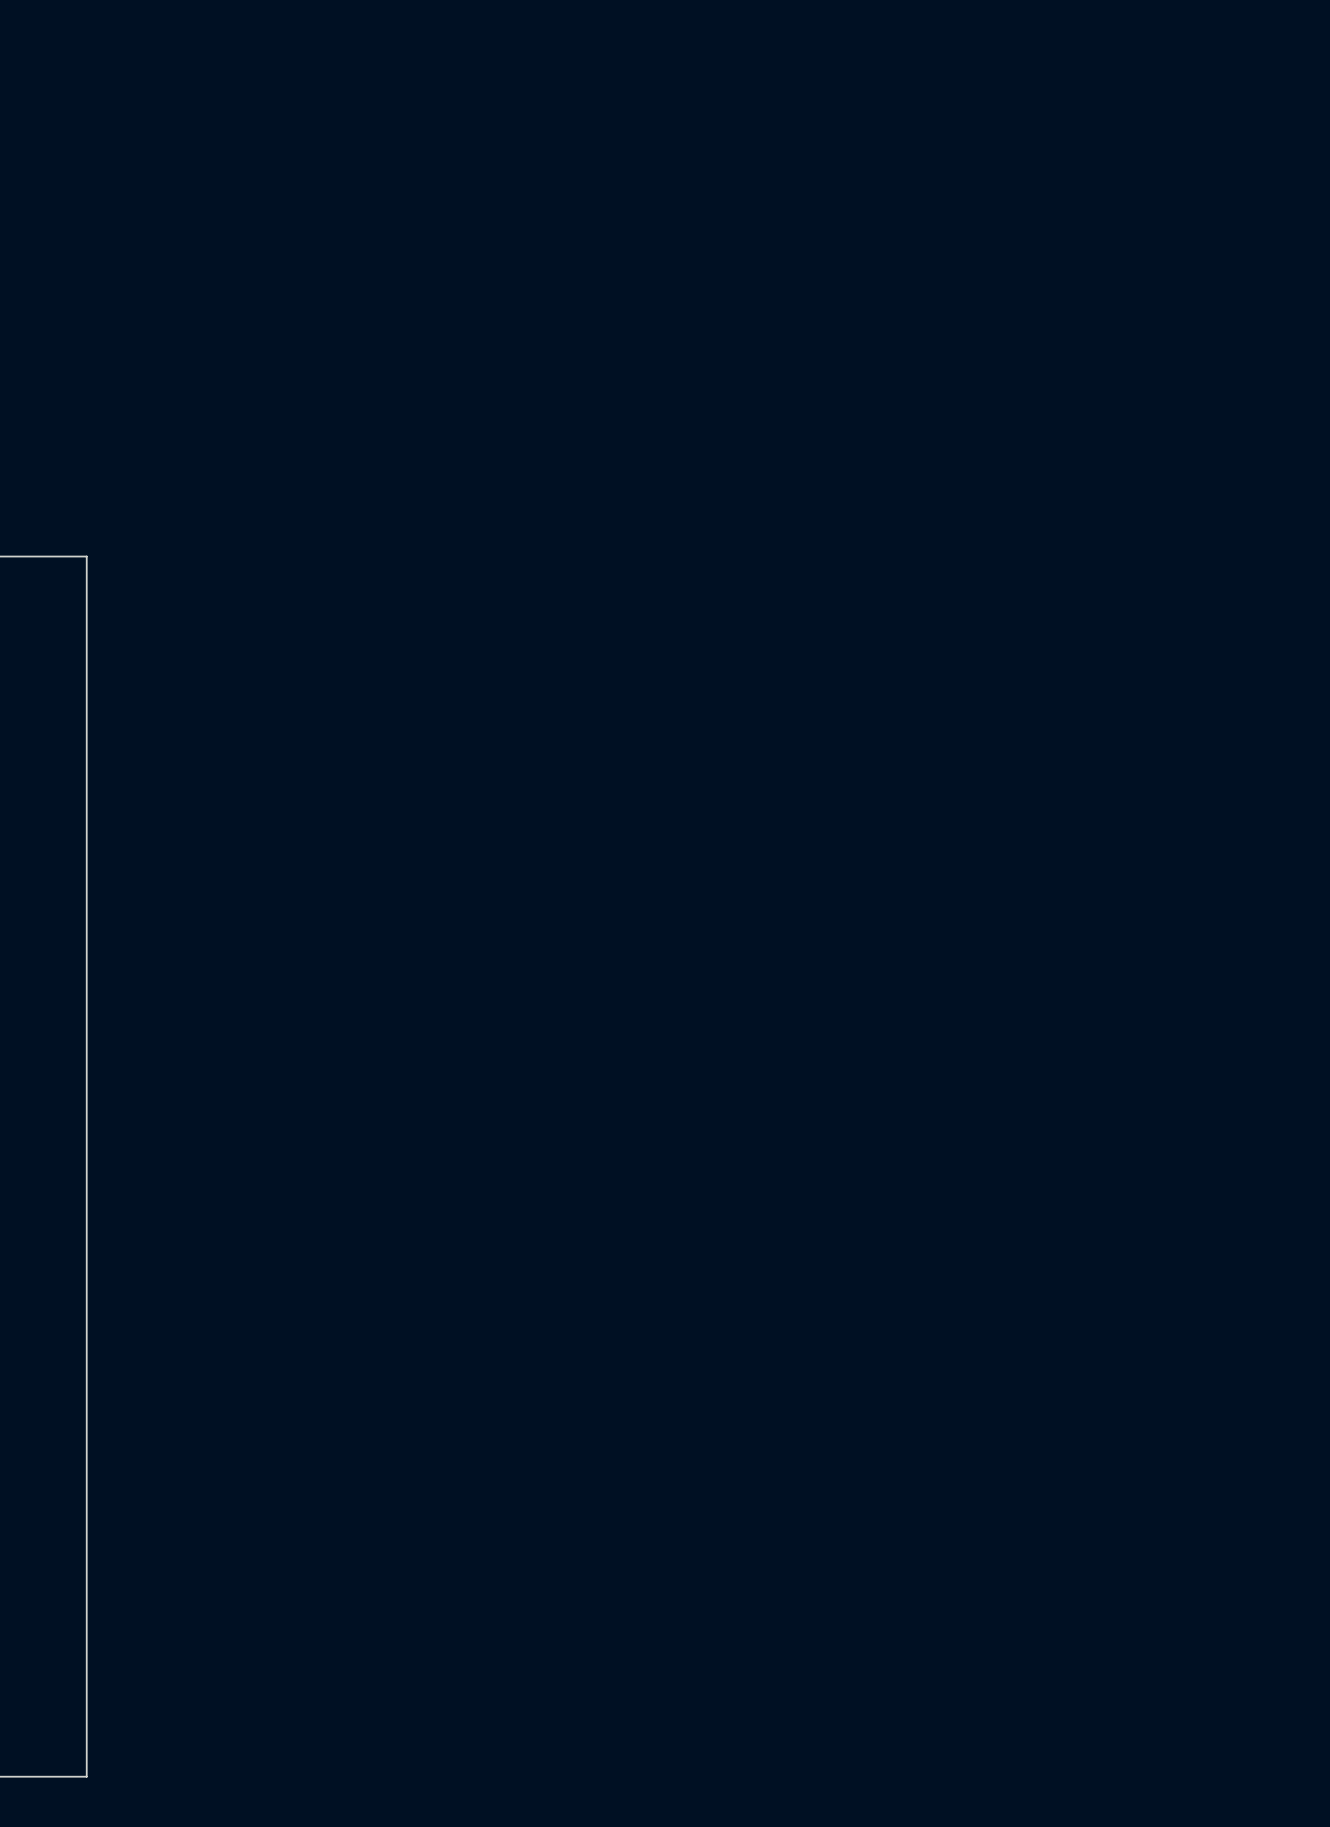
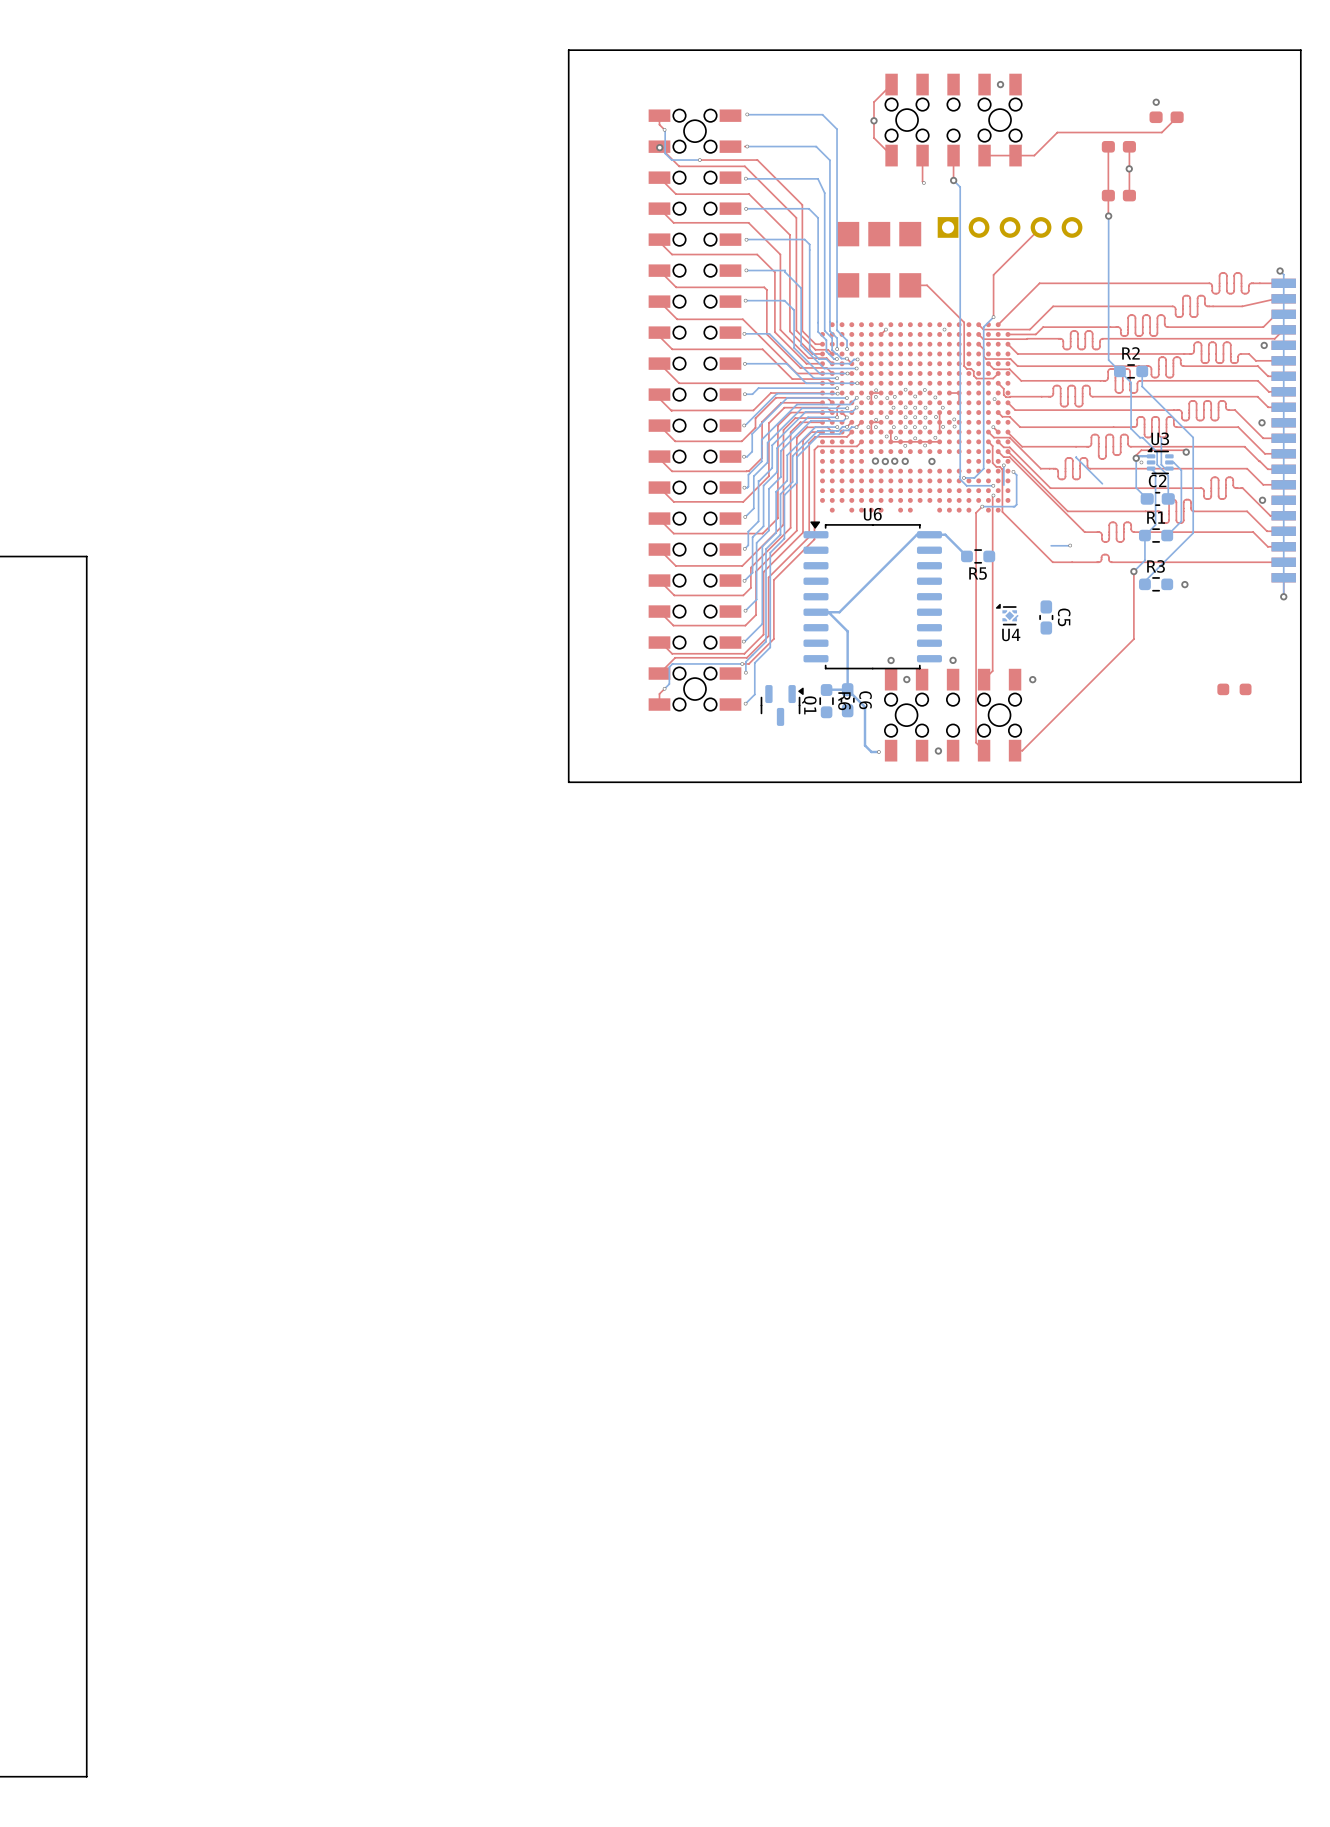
board edge: none -> (1300, 50) (568, 50) (568, 782) (1300, 782) (1300, 50)
top track: none -> (891, 84) (874, 102) (874, 138) (891, 155)
via: none -> (1000, 84)
via: none -> (1156, 102)
bottom track: none -> (747, 114) (822, 114) (837, 129) (837, 330) (847, 340) (847, 349)
via: none -> (747, 114)
top track: none -> (659, 115) (659, 124) (664, 129)
part: none -> (1166, 117)
top track: none -> (1177, 117) (1161, 132) (1057, 132) (1034, 155) (984, 155)
via: none -> (874, 120)
part: none -> (953, 120)
bottom track: none -> (664, 129) (665, 153) (671, 160) (699, 160)
via: none -> (664, 129)
top track: none -> (659, 146) (679, 166) (744, 166) (796, 217) (796, 330) (815, 349) (828, 349) (832, 353)
bottom track: none -> (747, 146) (816, 146) (829, 160) (829, 331) (837, 338) (837, 349)
top track: none -> (747, 146) (744, 146)
via: none -> (747, 146)
top track: none -> (1108, 146) (1108, 216)
part: none -> (1118, 146)
top track: none -> (1129, 146) (1129, 168)
via: none -> (659, 147)
top track: none -> (922, 155) (923, 182)
top track: none -> (953, 155) (953, 180)
top track: none -> (699, 160) (757, 160) (802, 204) (802, 331) (815, 344) (822, 344)
via: none -> (699, 160)
via: none -> (1129, 168)
top track: none -> (1129, 169) (1129, 195)
top track: none -> (659, 177) (675, 194) (749, 194) (789, 234) (789, 331) (812, 353) (822, 353)
bottom track: none -> (745, 178) (817, 178) (824, 193) (824, 330) (832, 338) (832, 350)
via: none -> (745, 178)
bottom track: none -> (953, 180) (960, 187) (960, 479) (966, 485) (993, 485)
via: none -> (953, 180)
via: none -> (923, 182)
part: none -> (1118, 195)
top track: none -> (659, 208) (673, 222) (748, 222) (780, 254) (780, 329) (808, 358) (826, 358) (832, 363)
bottom track: none -> (746, 208) (808, 208) (818, 217) (818, 331) (826, 340) (826, 351) (834, 359) (836, 359)
via: none -> (746, 208)
bottom track: none -> (1108, 216) (1108, 360) (1131, 382) (1131, 428) (1157, 452) (1157, 464) (1168, 475) (1168, 498)
via: none -> (1108, 216)
part: none -> (1010, 227)
top track: none -> (1041, 227) (993, 274) (993, 317)
bottom track: none -> (746, 239) (804, 239) (809, 244) (809, 349) (818, 359) (826, 359) (830, 363) (849, 363) (853, 359) (857, 359)
via: none -> (746, 239)
top track: none -> (659, 241) (672, 254) (757, 254) (774, 272) (774, 332) (806, 363) (822, 363)
part: none -> (879, 259)
top track: none -> (659, 270) (676, 287) (764, 287) (766, 289) (766, 334) (800, 367) (826, 367) (832, 373)
bottom track: none -> (746, 270) (785, 270) (801, 288) (801, 345) (824, 368) (856, 368)
via: none -> (746, 270)
bottom track: none -> (1280, 271) (1283, 274) (1283, 596)
via: none -> (1280, 271)
top track: none -> (1283, 283) (1251, 283) (1248, 291) (1245, 293) (1241, 291) (1241, 275) (1238, 273) (1234, 275) (1234, 291) (1231, 293) (1227, 291) (1226, 275) (1223, 273) (1219, 275) (1219, 291) (1216, 293) (1212, 292) (1212, 285) (1209, 283) (1039, 283) (998, 324)
top track: none -> (910, 285) (927, 285) (964, 322) (964, 366) (966, 368) (971, 368) (976, 378) (993, 378) (998, 373)
top track: none -> (1283, 298) (1242, 306) (1207, 306) (1205, 304) (1204, 296) (1199, 295) (1197, 298) (1197, 314) (1194, 317) (1190, 315) (1190, 298) (1187, 295) (1183, 297) (1182, 314) (1180, 317) (1176, 315) (1175, 308) (1173, 306) (1053, 306) (1029, 329) (983, 329) (978, 324)
bottom track: none -> (745, 300) (784, 300) (794, 310) (794, 347) (819, 373) (847, 373)
via: none -> (745, 300)
top track: none -> (659, 301) (677, 319) (742, 319) (797, 373) (822, 373)
top track: none -> (1283, 314) (1276, 314) (1263, 327) (1167, 327) (1164, 325) (1164, 316) (1160, 315) (1157, 317) (1157, 333) (1154, 336) (1150, 334) (1150, 317) (1147, 315) (1142, 317) (1142, 333) (1140, 336) (1135, 334) (1135, 317) (1132, 315) (1128, 317) (1128, 333) (1125, 336) (1121, 334) (1120, 328) (1117, 327) (1043, 327) (1035, 334) (1007, 334)
bottom track: none -> (993, 317) (983, 327) (983, 468) (974, 477) (963, 477)
via: none -> (993, 317)
top track: none -> (885, 329) (881, 334)
via: none -> (885, 329)
via: none -> (944, 329)
top track: none -> (1283, 329) (1274, 338) (1102, 338) (1100, 340) (1099, 347) (1097, 349) (1092, 347) (1092, 333) (1090, 331) (1085, 332) (1085, 347) (1082, 349) (1078, 347) (1077, 333) (1075, 331) (1070, 332) (1070, 347) (1067, 349) (1063, 348) (1063, 340) (1060, 338) (983, 339) (978, 334)
top track: none -> (659, 332) (659, 336) (672, 349) (762, 349) (792, 379) (828, 379) (832, 383)
bottom track: none -> (744, 333) (769, 333) (813, 378) (837, 378)
via: none -> (744, 333)
top track: none -> (978, 344) (983, 349) (983, 356) (986, 359) (1010, 359) (1017, 366) (1148, 366) (1151, 368) (1151, 376) (1156, 377) (1158, 374) (1158, 359) (1163, 357) (1166, 359) (1166, 375) (1170, 377) (1173, 374) (1173, 359) (1177, 357) (1183, 366) (1257, 366) (1268, 376) (1283, 376)
top track: none -> (1007, 344) (1017, 353) (1191, 353) (1194, 352) (1194, 343) (1198, 342) (1201, 344) (1201, 361) (1205, 363) (1208, 360) (1208, 344) (1213, 342) (1216, 344) (1216, 361) (1220, 363) (1223, 360) (1223, 344) (1228, 342) (1230, 344) (1230, 360) (1232, 363) (1237, 362) (1238, 355) (1241, 353) (1249, 353) (1255, 360) (1283, 360)
via: none -> (1264, 345)
via: none -> (837, 349)
via: none -> (847, 349)
bottom track: none -> (832, 350) (841, 358) (846, 358)
top track: none -> (846, 358) (851, 363)
via: none -> (846, 358)
via: none -> (836, 359)
via: none -> (857, 359)
top track: none -> (659, 363) (679, 383) (822, 383)
via: none -> (744, 363)
bottom track: none -> (745, 363) (786, 363) (806, 383) (857, 383)
top track: none -> (988, 363) (994, 369) (1009, 369) (1021, 380) (1105, 380) (1108, 378) (1108, 370) (1113, 368) (1115, 371) (1115, 390) (1118, 392) (1122, 390) (1122, 371) (1125, 368) (1129, 370) (1130, 390) (1132, 392) (1136, 391) (1137, 382) (1140, 380) (1257, 380) (1268, 391) (1283, 391)
via: none -> (856, 368)
R2: none -> (1131, 371)
bottom track: none -> (1142, 371) (1142, 386) (1193, 437) (1193, 533) (1144, 581) (1144, 584)
via: none -> (847, 373)
via: none -> (837, 378)
via: none -> (857, 383)
top track: none -> (998, 383) (1003, 388) (1003, 394) (1006, 397) (1051, 396) (1053, 394) (1053, 386) (1058, 385) (1060, 388) (1060, 404) (1063, 406) (1067, 404) (1067, 388) (1070, 385) (1075, 387) (1075, 404) (1081, 405) (1082, 387) (1087, 385) (1089, 387) (1090, 394) (1092, 396) (1257, 396) (1268, 407) (1283, 407)
bottom track: none -> (837, 388) (758, 388) (752, 394) (744, 394)
via: none -> (837, 388)
via: none -> (905, 389)
via: none -> (876, 390)
via: none -> (924, 390)
top track: none -> (822, 393) (770, 393) (753, 410) (671, 410) (659, 398) (659, 394)
bottom track: none -> (837, 393) (776, 393) (745, 425)
via: none -> (837, 393)
top track: none -> (881, 393) (871, 393) (871, 402)
top track: none -> (949, 393) (959, 393) (959, 402)
via: none -> (744, 394)
via: none -> (875, 396)
via: none -> (894, 396)
via: none -> (915, 396)
bottom track: none -> (856, 397) (850, 404) (797, 404) (761, 439) (761, 461) (748, 474) (748, 486) (744, 487)
via: none -> (856, 397)
via: none -> (868, 397)
via: none -> (935, 397)
bottom track: none -> (846, 398) (787, 398) (752, 433) (752, 451) (747, 456) (744, 456)
via: none -> (846, 398)
via: none -> (887, 398)
via: none -> (994, 399)
top track: none -> (822, 402) (781, 402) (762, 421) (762, 457) (746, 471)
top track: none -> (832, 402) (827, 397) (776, 397) (755, 418) (755, 427) (741, 441) (675, 441) (659, 425)
top track: none -> (842, 402) (837, 407) (837, 417)
top track: none -> (1007, 402) (1015, 410) (1179, 410) (1181, 412) (1182, 419) (1186, 420) (1189, 418) (1189, 402) (1193, 400) (1196, 403) (1196, 418) (1200, 420) (1203, 418) (1204, 402) (1208, 400) (1211, 403) (1211, 418) (1215, 420) (1218, 418) (1218, 402) (1223, 400) (1225, 402) (1226, 409) (1235, 410) (1263, 438) (1283, 438)
bottom track: none -> (856, 407) (852, 411) (805, 411) (772, 445) (772, 468) (758, 480) (758, 521) (748, 531) (748, 545) (744, 548)
via: none -> (856, 407)
via: none -> (893, 407)
via: none -> (905, 407)
via: none -> (915, 407)
via: none -> (925, 407)
via: none -> (942, 407)
bottom track: none -> (847, 408) (802, 408) (767, 442) (767, 462) (753, 476) (753, 508) (745, 516)
via: none -> (847, 408)
part: none -> (694, 410)
top track: none -> (822, 412) (791, 412) (777, 425) (777, 518) (762, 533) (673, 533) (659, 518)
top track: none -> (832, 412) (827, 407) (784, 407) (768, 423) (768, 476) (743, 501) (673, 501) (659, 487)
top track: none -> (842, 412) (846, 417)
top track: none -> (939, 412) (939, 432)
top track: none -> (998, 412) (1002, 416) (1009, 416) (1020, 427) (1134, 427) (1137, 425) (1137, 417) (1141, 416) (1144, 419) (1144, 435) (1147, 437) (1151, 435) (1152, 417) (1158, 418) (1159, 435) (1163, 437) (1166, 434) (1166, 418) (1171, 416) (1176, 427) (1238, 427) (1264, 453) (1283, 453)
via: none -> (935, 416)
bottom track: none -> (837, 417) (807, 417) (777, 448) (777, 472) (763, 485) (763, 526) (752, 537) (752, 572) (744, 580)
via: none -> (837, 417)
bottom track: none -> (846, 417) (843, 420) (810, 420) (780, 450) (780, 476) (768, 488) (768, 530) (756, 542) (756, 599) (745, 610)
via: none -> (846, 417)
via: none -> (887, 417)
via: none -> (905, 417)
part: none -> (915, 417)
via: none -> (915, 417)
via: none -> (925, 417)
via: none -> (876, 419)
via: none -> (954, 419)
top track: none -> (822, 422) (800, 422) (790, 432) (790, 527) (750, 567) (750, 587) (743, 595) (674, 595) (659, 580)
top track: none -> (832, 422) (828, 418) (795, 418) (783, 429) (783, 524) (742, 565) (675, 565) (659, 549)
top track: none -> (851, 422) (847, 426)
top track: none -> (861, 422) (856, 427)
top track: none -> (881, 422) (871, 422) (871, 432)
via: none -> (1262, 422)
via: none -> (744, 425)
bottom track: none -> (847, 426) (842, 426) (838, 430) (817, 430) (792, 456) (792, 481) (780, 494) (780, 534) (766, 549) (766, 641) (745, 661) (745, 672)
via: none -> (847, 426)
via: none -> (943, 426)
via: none -> (954, 426)
bottom track: none -> (837, 427) (815, 427) (787, 455) (787, 480) (776, 491) (776, 532) (762, 546) (762, 624) (743, 641)
via: none -> (837, 427)
bottom track: none -> (856, 427) (843, 430) (839, 434) (819, 434) (796, 457) (796, 482) (784, 495) (784, 538) (770, 552) (770, 647) (754, 662) (754, 694) (745, 703)
via: none -> (856, 427)
via: none -> (868, 427)
via: none -> (875, 427)
via: none -> (893, 427)
via: none -> (905, 427)
via: none -> (914, 427)
via: none -> (925, 427)
top track: none -> (993, 427) (998, 432)
via: none -> (993, 427)
part: none -> (1283, 430)
top track: none -> (822, 432) (811, 432) (803, 440) (803, 532) (763, 572) (763, 634) (744, 653) (672, 653) (659, 642)
top track: none -> (832, 432) (827, 427) (807, 427) (796, 437) (796, 530) (756, 571) (756, 614) (745, 625) (673, 625) (659, 611)
top track: none -> (851, 432) (847, 436) (815, 436) (809, 442) (809, 536) (768, 577) (768, 636) (746, 657) (675, 657) (659, 673)
top track: none -> (890, 432) (890, 441) (939, 441)
top track: none -> (988, 432) (994, 437) (1009, 437) (1040, 468) (1057, 469) (1060, 479) (1065, 477) (1065, 460) (1068, 457) (1072, 460) (1073, 477) (1079, 478) (1080, 460) (1084, 457) (1087, 459) (1087, 466) (1090, 468) (1247, 468) (1263, 484) (1283, 484)
top track: none -> (1007, 432) (1022, 446) (1088, 446) (1091, 444) (1091, 435) (1096, 434) (1098, 437) (1098, 456) (1101, 458) (1105, 456) (1106, 437) (1108, 434) (1113, 436) (1113, 452) (1115, 455) (1120, 453) (1120, 437) (1123, 434) (1127, 435) (1128, 444) (1130, 446) (1244, 446) (1267, 469) (1283, 469)
via: none -> (886, 436)
via: none -> (935, 437)
bottom track: none -> (1161, 437) (1161, 464) (1165, 468) (1169, 468)
via: none -> (895, 438)
via: none -> (915, 438)
top track: none -> (861, 441) (856, 446) (817, 446) (814, 449) (814, 539) (773, 579) (773, 638) (748, 663) (742, 663)
top track: none -> (988, 441) (992, 446) (992, 463) (1002, 469) (1002, 511) (1052, 562) (1098, 562) (1104, 554) (1108, 555) (1109, 560) (1111, 562) (1283, 562)
top track: none -> (998, 441) (1003, 447) (1009, 447) (1050, 488) (1201, 488) (1203, 490) (1204, 497) (1208, 499) (1211, 496) (1211, 479) (1216, 477) (1218, 479) (1218, 497) (1223, 499) (1225, 496) (1226, 479) (1230, 477) (1233, 479) (1234, 487) (1242, 488) (1270, 515) (1283, 515)
via: none -> (905, 445)
via: none -> (925, 445)
top track: none -> (998, 451) (1003, 457) (1009, 457) (1084, 532) (1100, 532) (1103, 541) (1108, 540) (1109, 524) (1112, 522) (1116, 524) (1117, 540) (1122, 541) (1124, 524) (1128, 522) (1133, 532) (1253, 532) (1267, 546) (1283, 546)
top track: none -> (1007, 451) (1067, 511) (1159, 511) (1161, 513) (1162, 521) (1166, 523) (1169, 520) (1169, 501) (1173, 499) (1176, 502) (1176, 521) (1181, 523) (1183, 520) (1183, 501) (1188, 499) (1190, 501) (1192, 511) (1247, 511) (1267, 531) (1283, 531)
top track: none -> (1186, 452) (1184, 450) (1141, 450) (1136, 455) (1136, 458)
via: none -> (1186, 452)
top track: none -> (659, 456) (672, 471) (746, 471)
via: none -> (744, 456)
bottom track: none -> (1076, 456) (1102, 483)
bottom track: none -> (1151, 456) (1138, 456) (1136, 458) (1136, 487) (1147, 498)
via: none -> (1136, 458)
U3: none -> (1160, 460)
via: none -> (875, 461)
via: none -> (885, 461)
via: none -> (894, 461)
via: none -> (905, 461)
via: none -> (931, 461)
via: none -> (1141, 462)
bottom track: none -> (1169, 462) (1173, 462) (1181, 470) (1181, 521) (1167, 535)
bottom track: none -> (1003, 465) (1003, 485)
via: none -> (1003, 465)
bottom track: none -> (1151, 468) (1155, 473) (1155, 524) (1144, 535) (1144, 560) (1133, 571)
bottom track: none -> (1013, 471) (1016, 475) (1016, 504) (1014, 506) (982, 506)
via: none -> (1013, 471)
via: none -> (963, 477)
via: none -> (993, 485)
via: none -> (744, 487)
top track: none -> (993, 495) (992, 671) (984, 679)
via: none -> (993, 495)
C2: none -> (1157, 498)
via: none -> (1262, 500)
top track: none -> (982, 506) (976, 512) (976, 742) (984, 750)
via: none -> (982, 506)
via: none -> (745, 516)
R1: none -> (1156, 535)
bottom track: none -> (1070, 545) (1051, 545)
via: none -> (1070, 545)
via: none -> (744, 548)
bottom track: none -> (966, 556) (945, 534) (916, 534) (839, 612) (815, 612)
R5: none -> (978, 556)
top track: none -> (1133, 571) (1133, 639) (1022, 750) (1015, 750)
via: none -> (1133, 571)
via: none -> (744, 580)
R3: none -> (1156, 584)
via: none -> (1184, 584)
U6: none -> (872, 595)
via: none -> (1283, 596)
via: none -> (745, 610)
bottom track: none -> (828, 612) (847, 631) (847, 689)
U4: none -> (1006, 614)
bottom track: none -> (1017, 615) (1013, 619)
C5: none -> (1046, 617)
via: none -> (743, 641)
via: none -> (891, 660)
via: none -> (953, 660)
bottom track: none -> (742, 663) (672, 663) (669, 667) (669, 684) (664, 688)
via: none -> (742, 663)
via: none -> (745, 672)
via: none -> (906, 679)
via: none -> (1032, 679)
top track: none -> (664, 688) (659, 693) (659, 704)
via: none -> (664, 688)
bottom track: none -> (847, 689) (865, 707) (865, 745) (871, 752) (878, 752)
bottom track: none -> (847, 689) (826, 690)
part: none -> (1234, 689)
C6: none -> (847, 700)
R6: none -> (826, 701)
via: none -> (745, 703)
Q1: none -> (782, 705)
part: none -> (953, 715)
via: none -> (938, 751)
via: none -> (878, 752)

